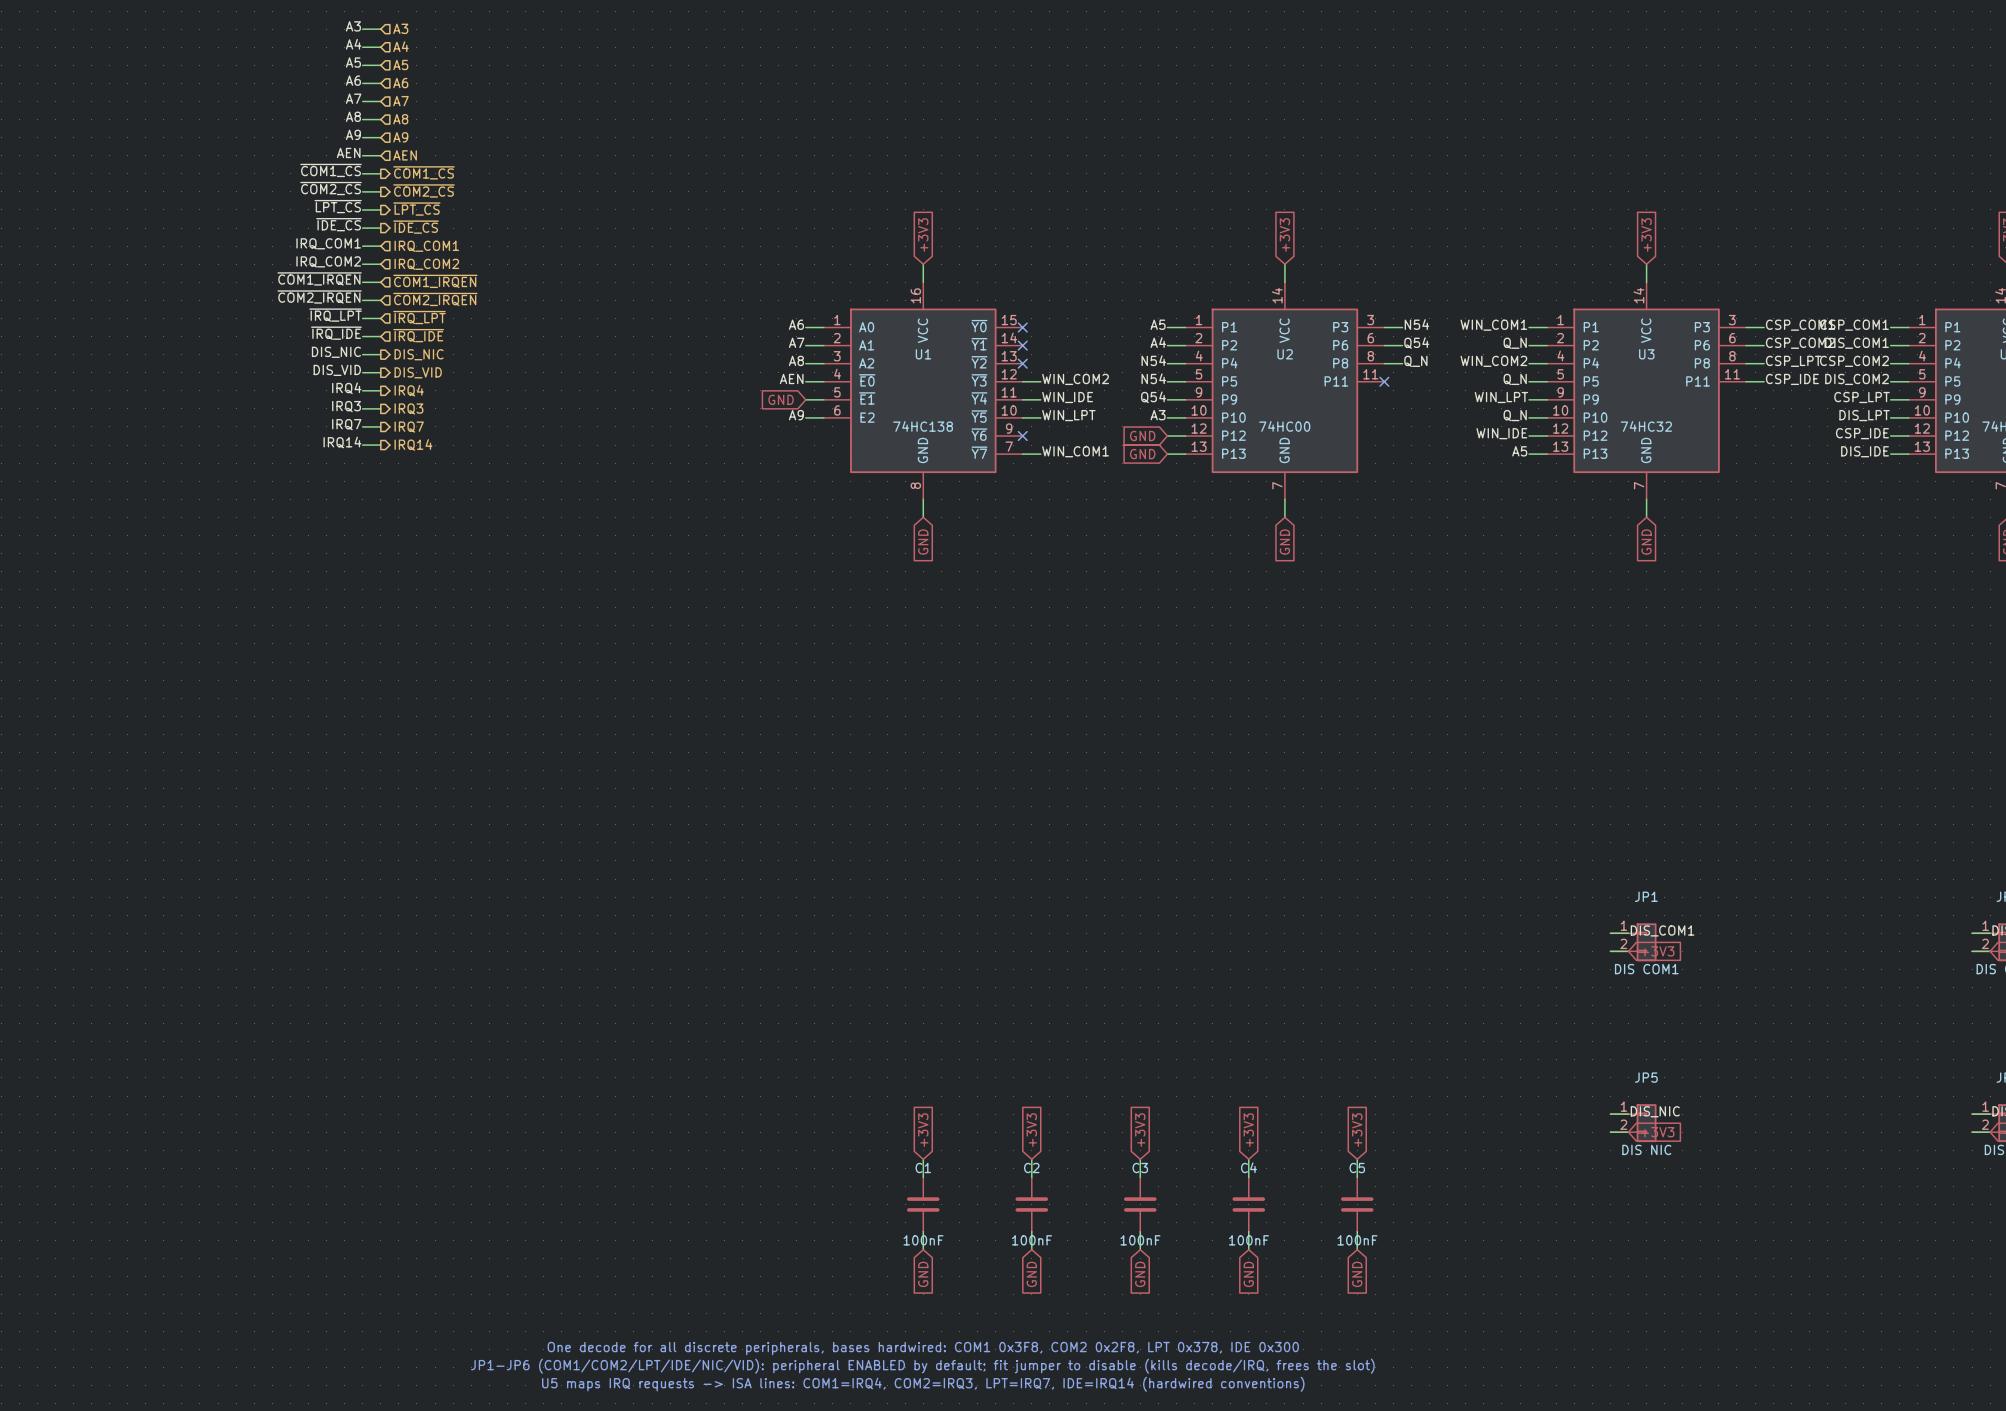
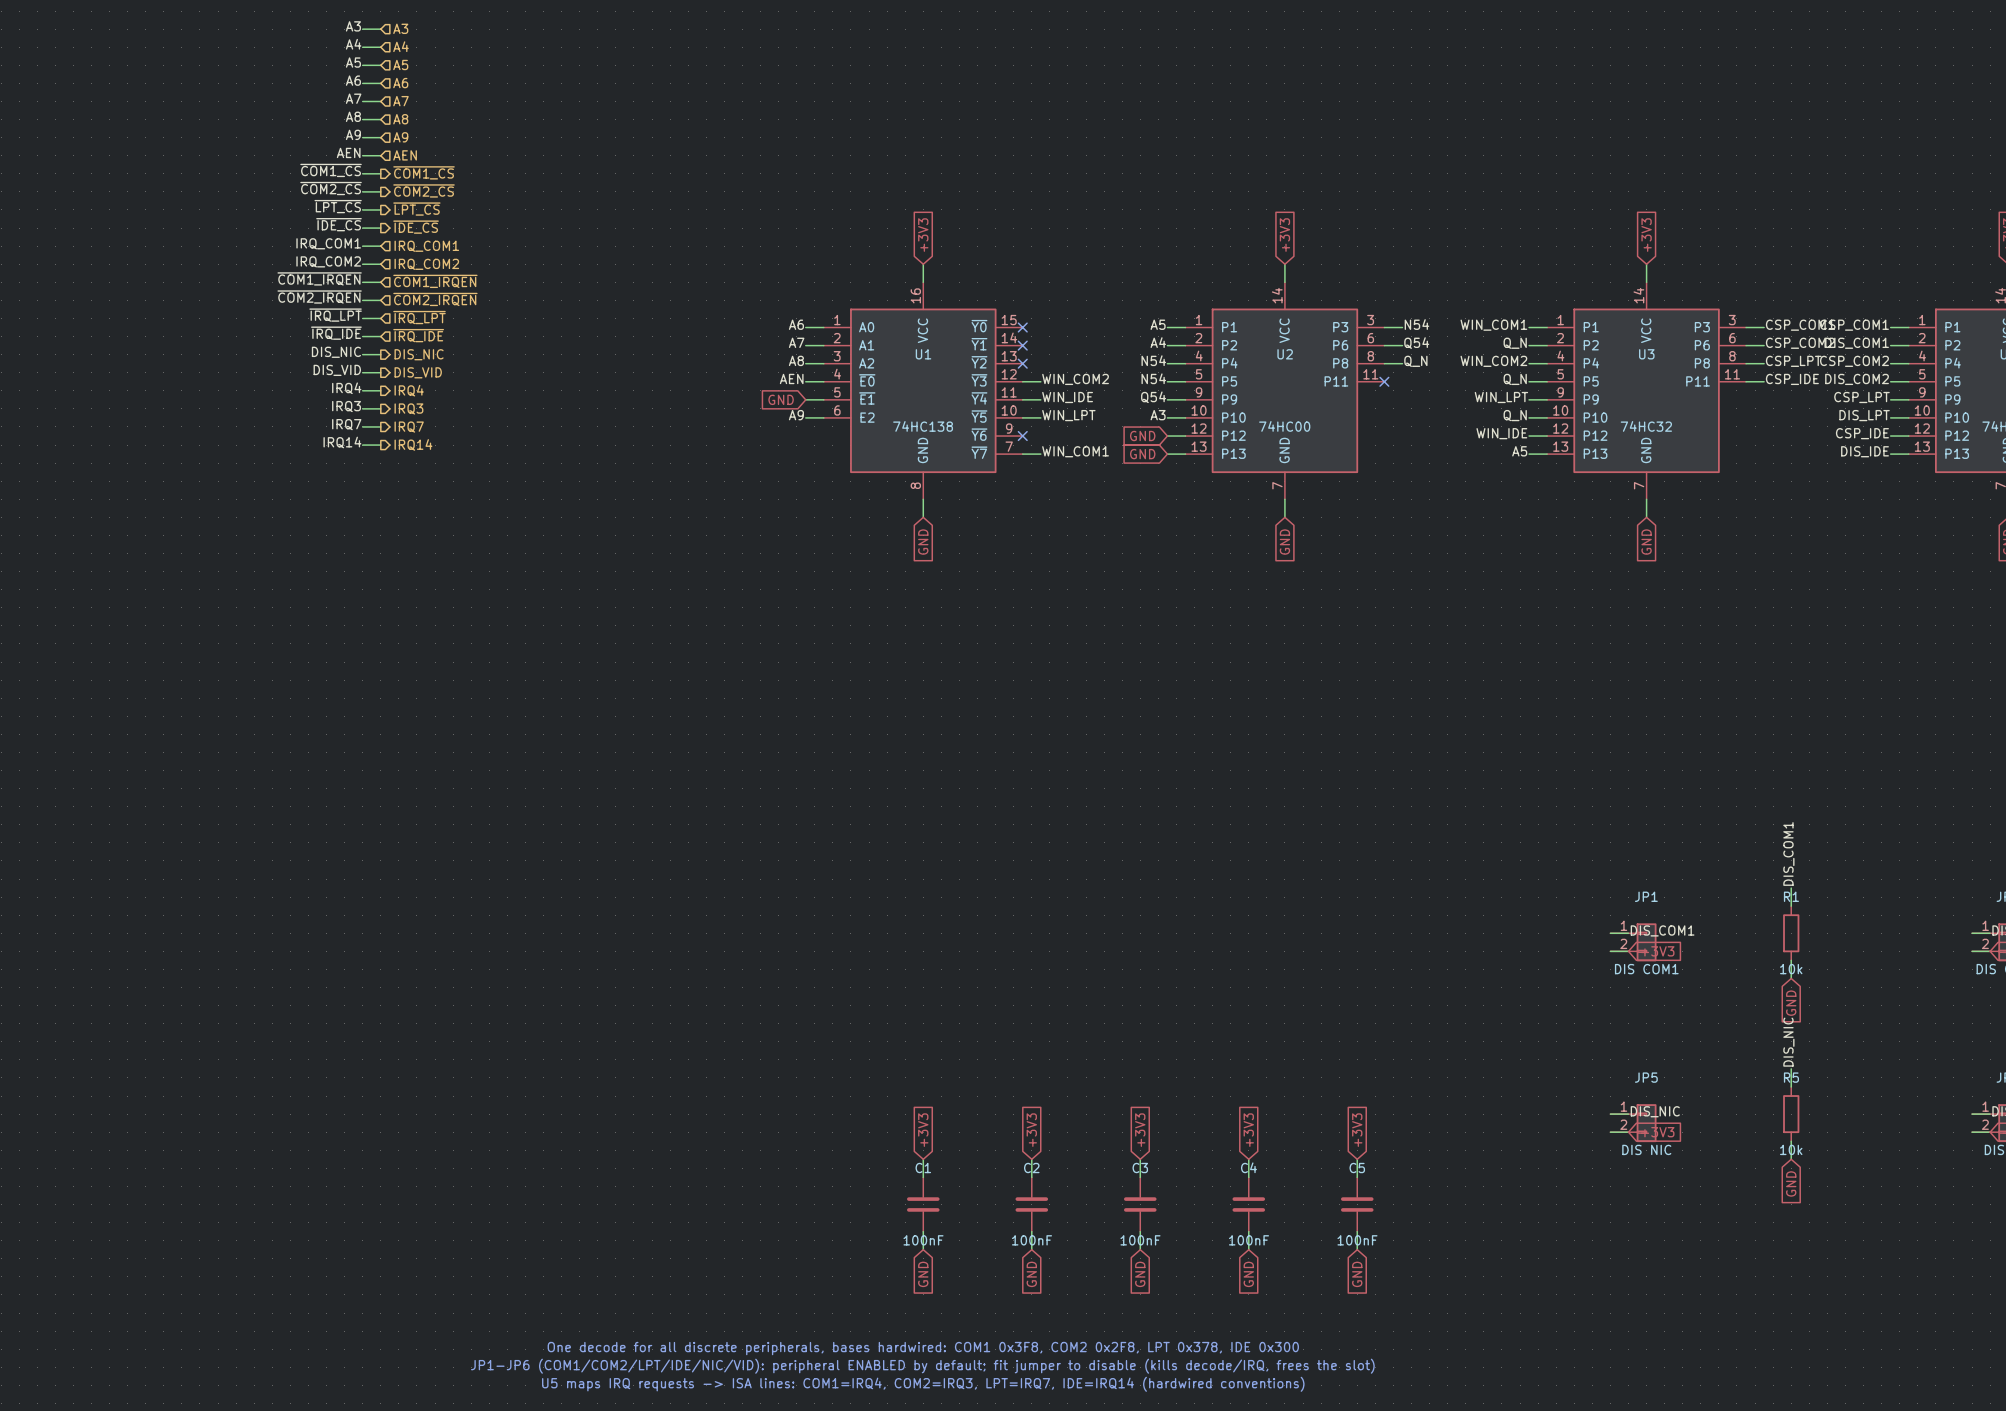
label: none -> DIS_COM1 (1788, 853)
wire: none -> (1791, 888) (1791, 906)
R1: none -> 10k (1791, 933)
wire: none -> (1791, 960) (1791, 978)
global label: none -> GND (1791, 1003)
label: none -> DIS_NIC (1788, 1042)
wire: none -> (1791, 1068) (1791, 1086)
R5: none -> 10k (1791, 1114)
wire: none -> (1791, 1141) (1791, 1159)
global label: none -> GND (1791, 1183)

